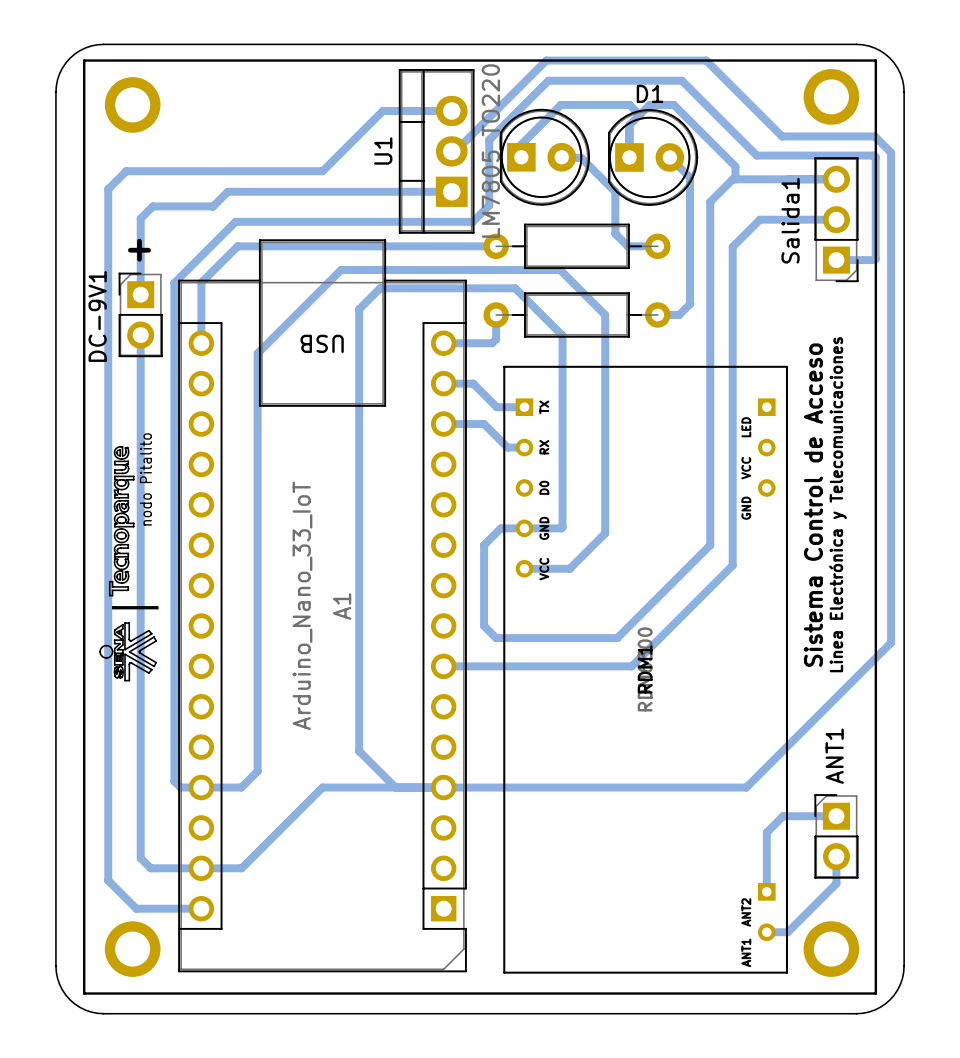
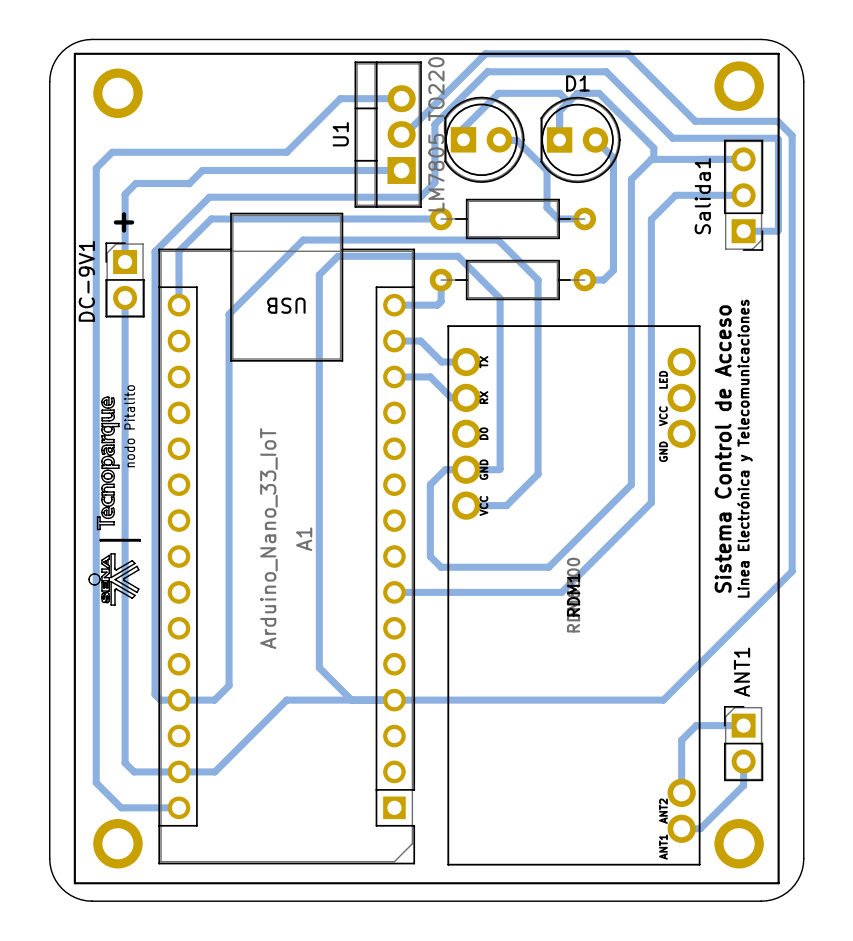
RDM1 footprint: [503, 365, 788, 974] -> [447, 325, 701, 866]

